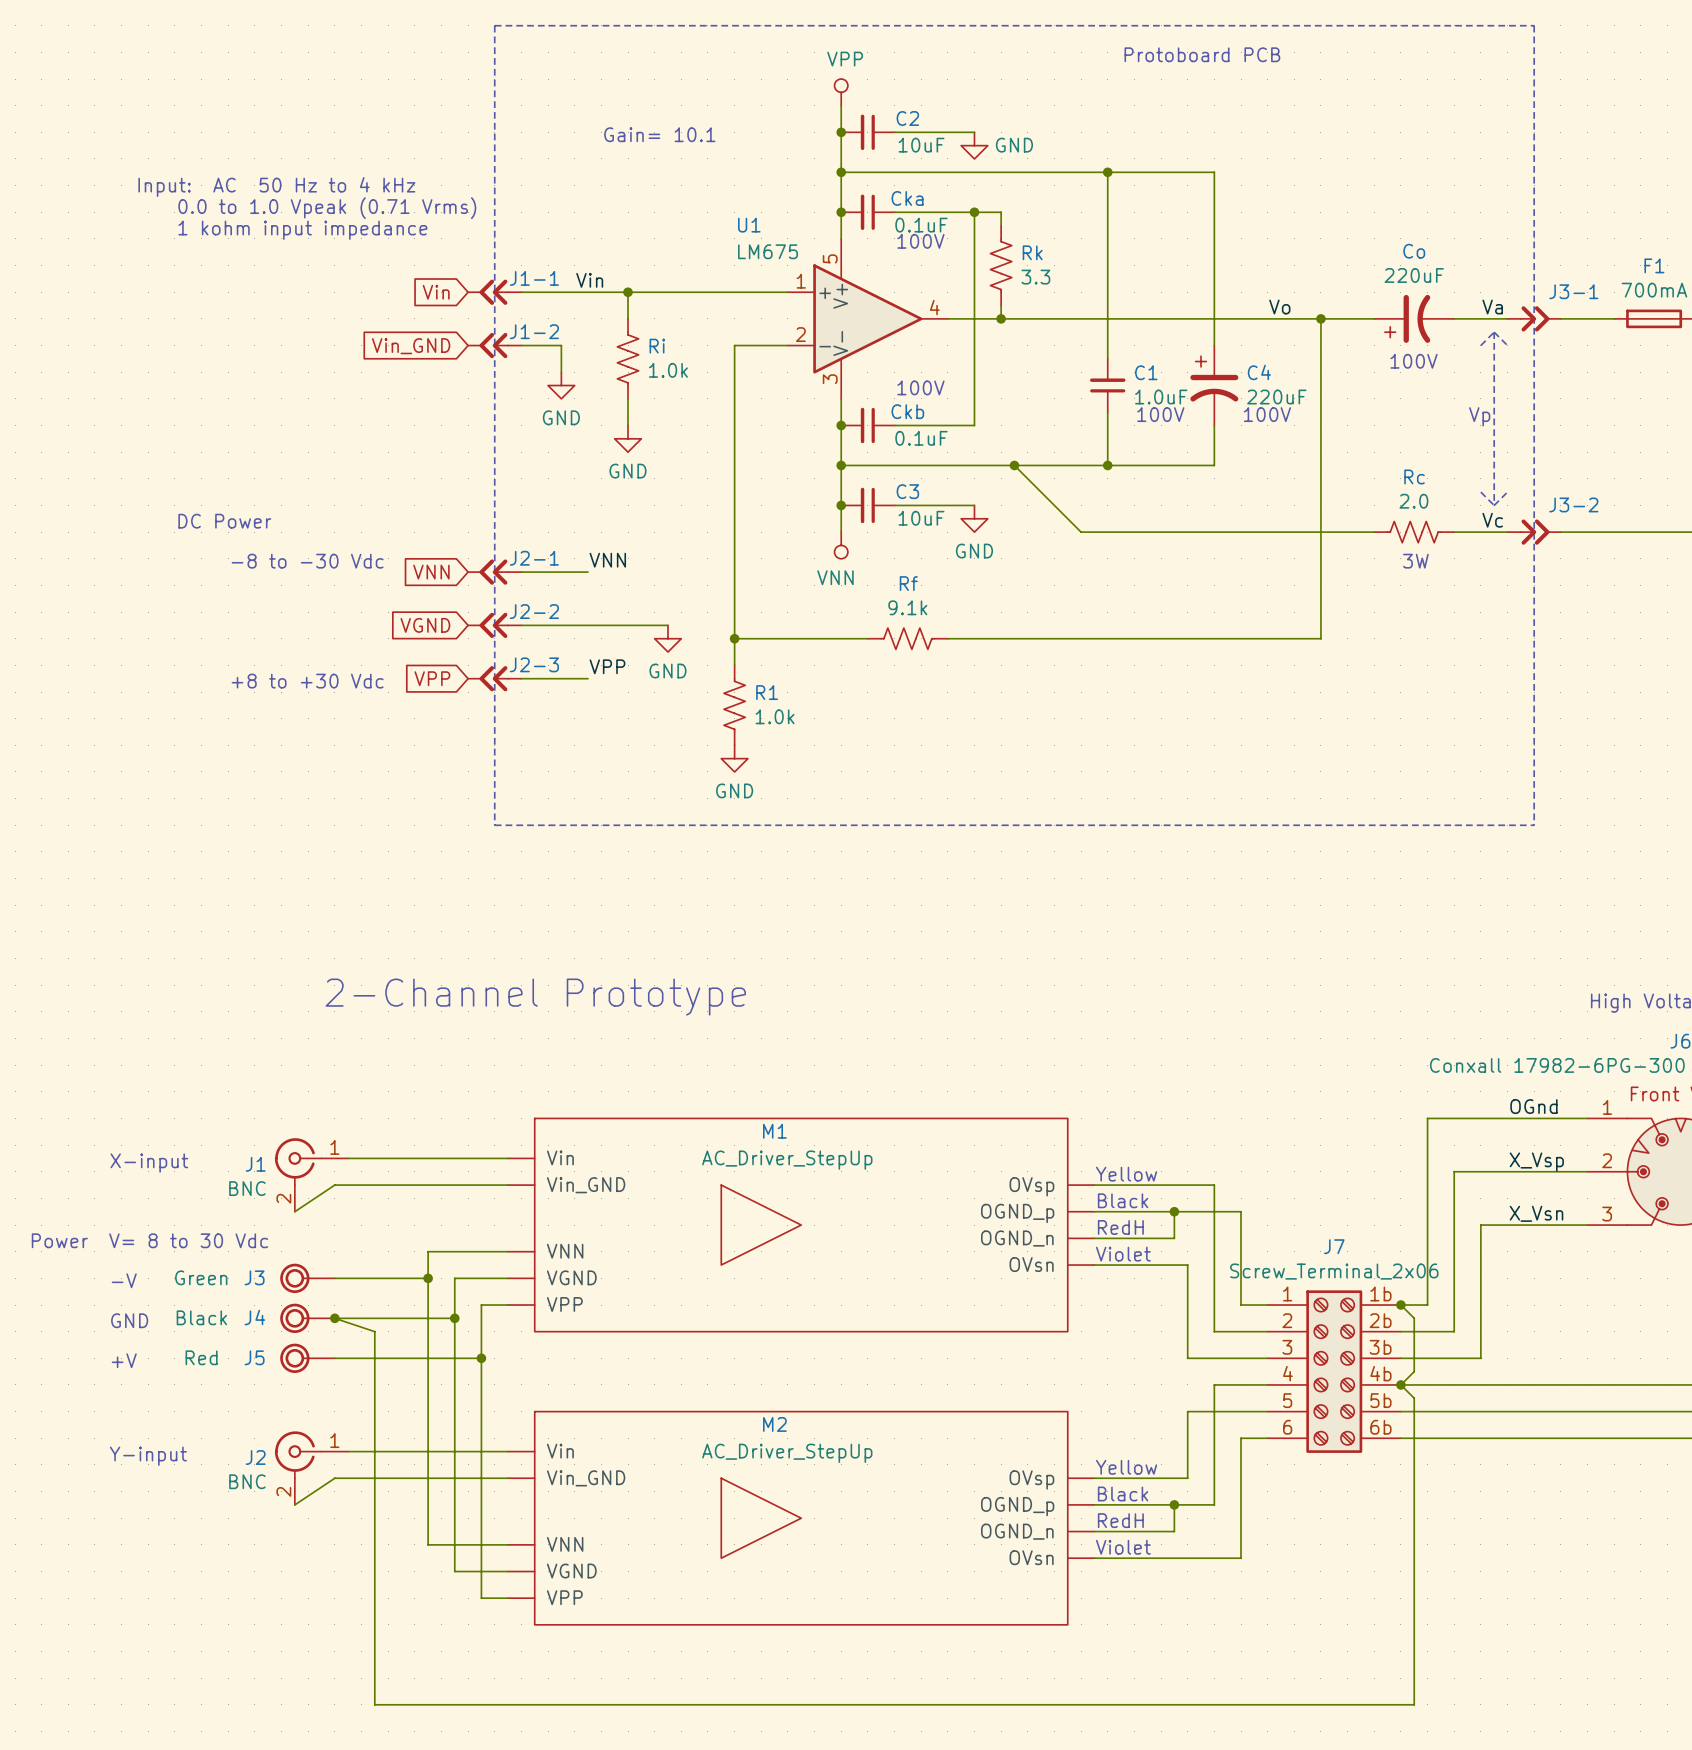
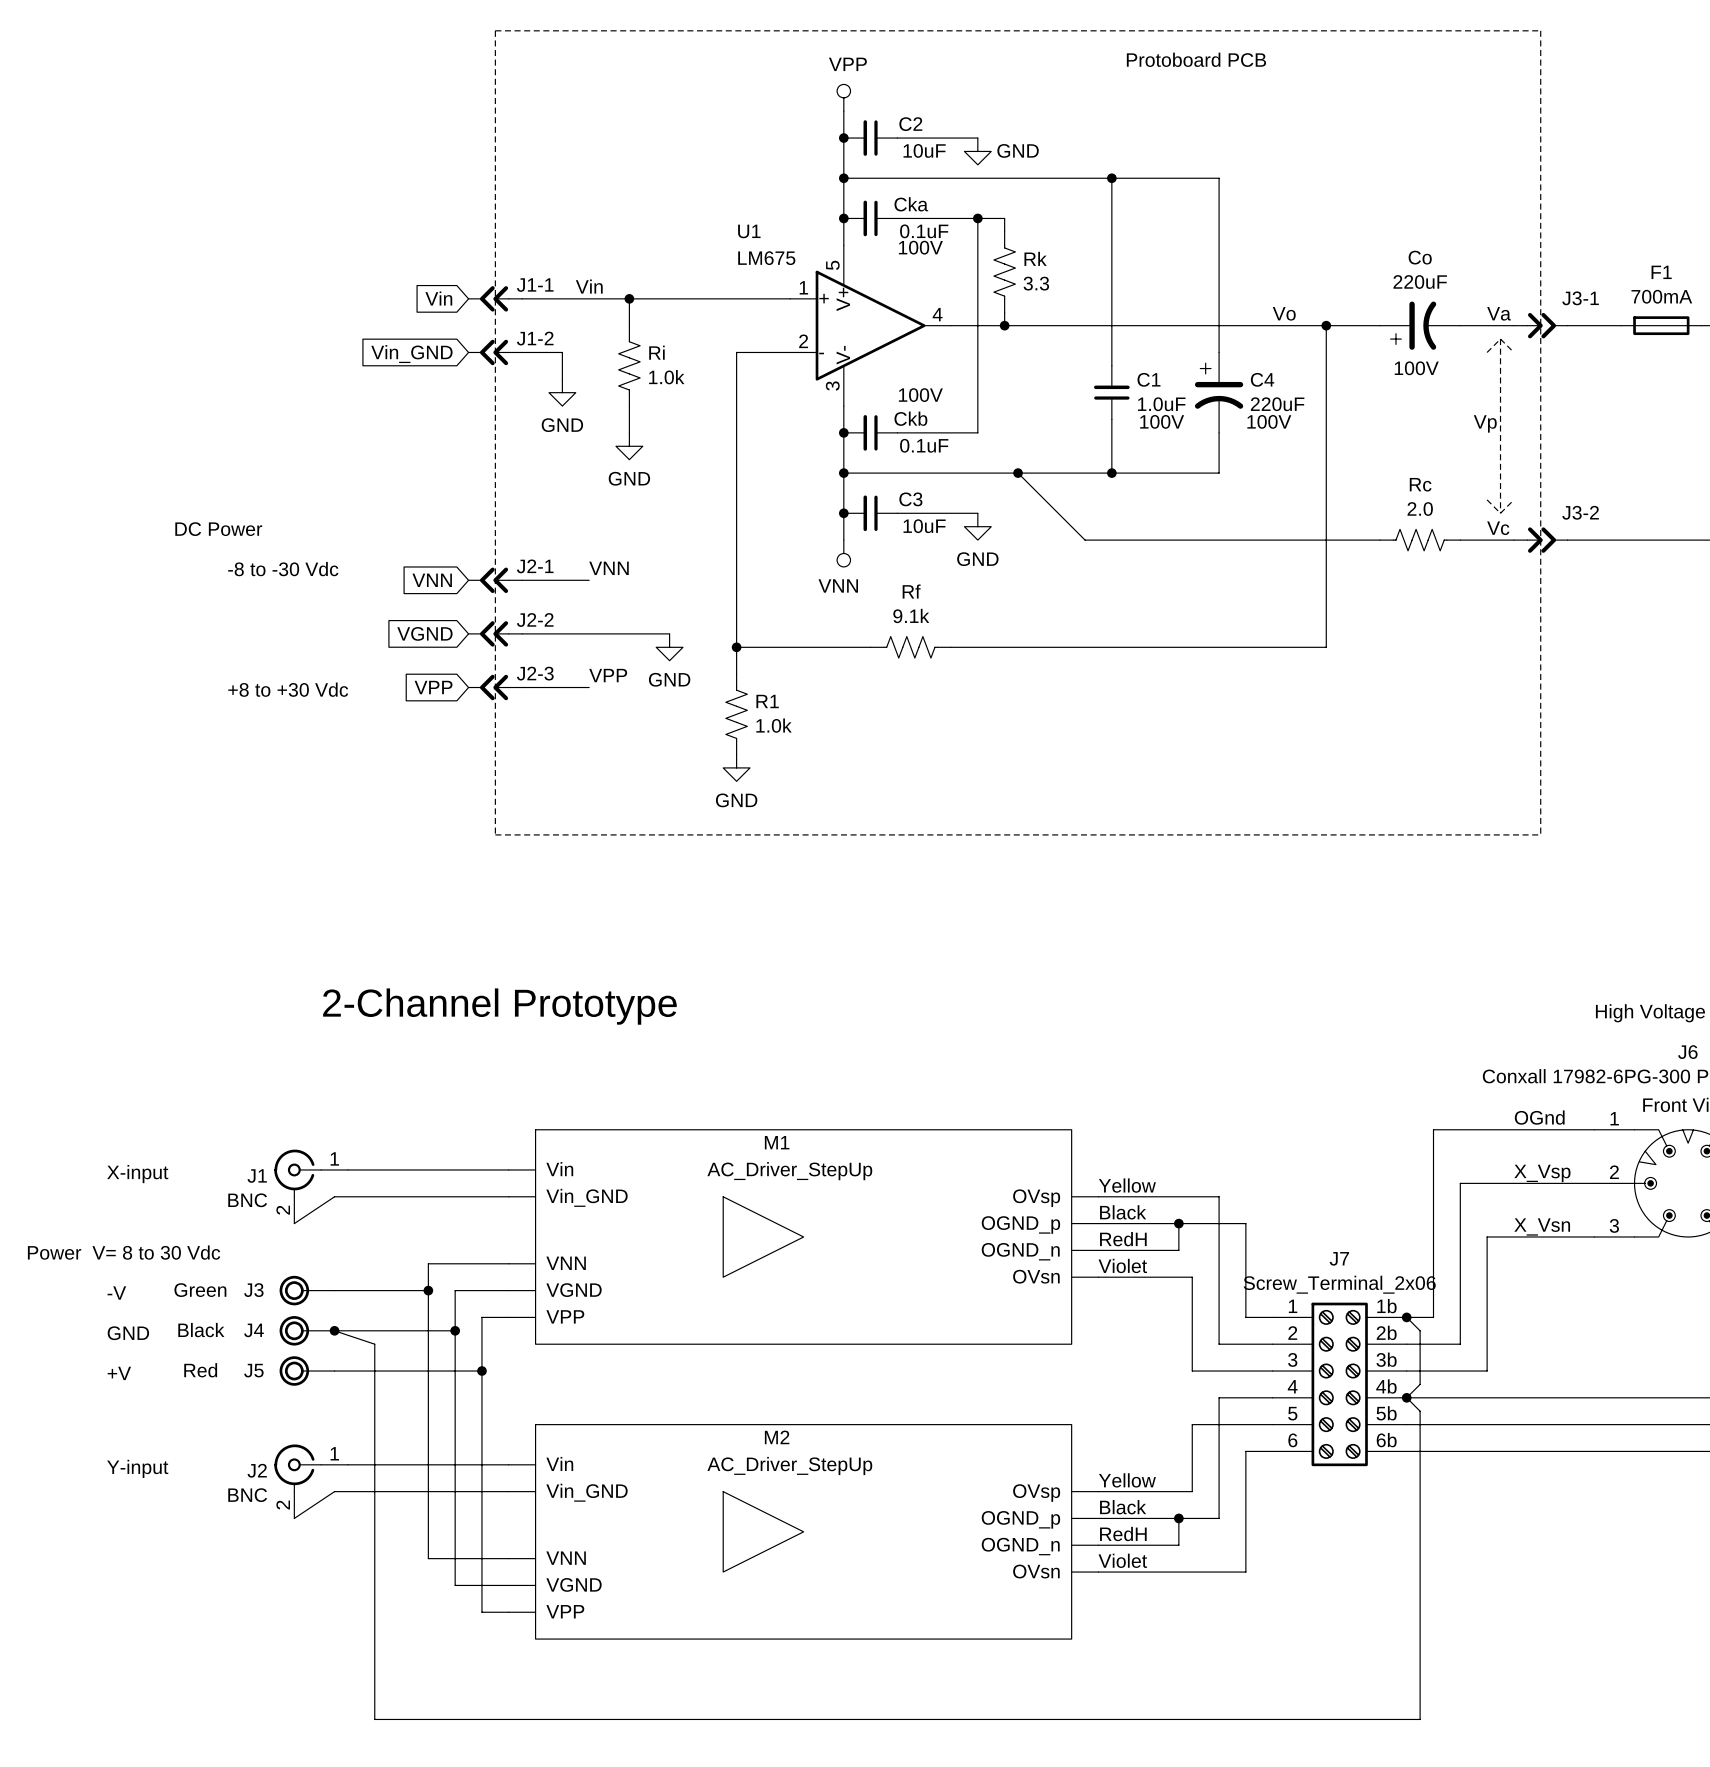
text: Gain= 10.1 (659, 134) -> none
text: Input: AC 50 Hz to 4 kHz (276, 187) -> none
text: 0.0 to 1.0 Vpeak (0.71 Vrms) (327, 208) -> none
text: 1 kohm input impedance (302, 230) -> none
text: 3W (1415, 561) -> none

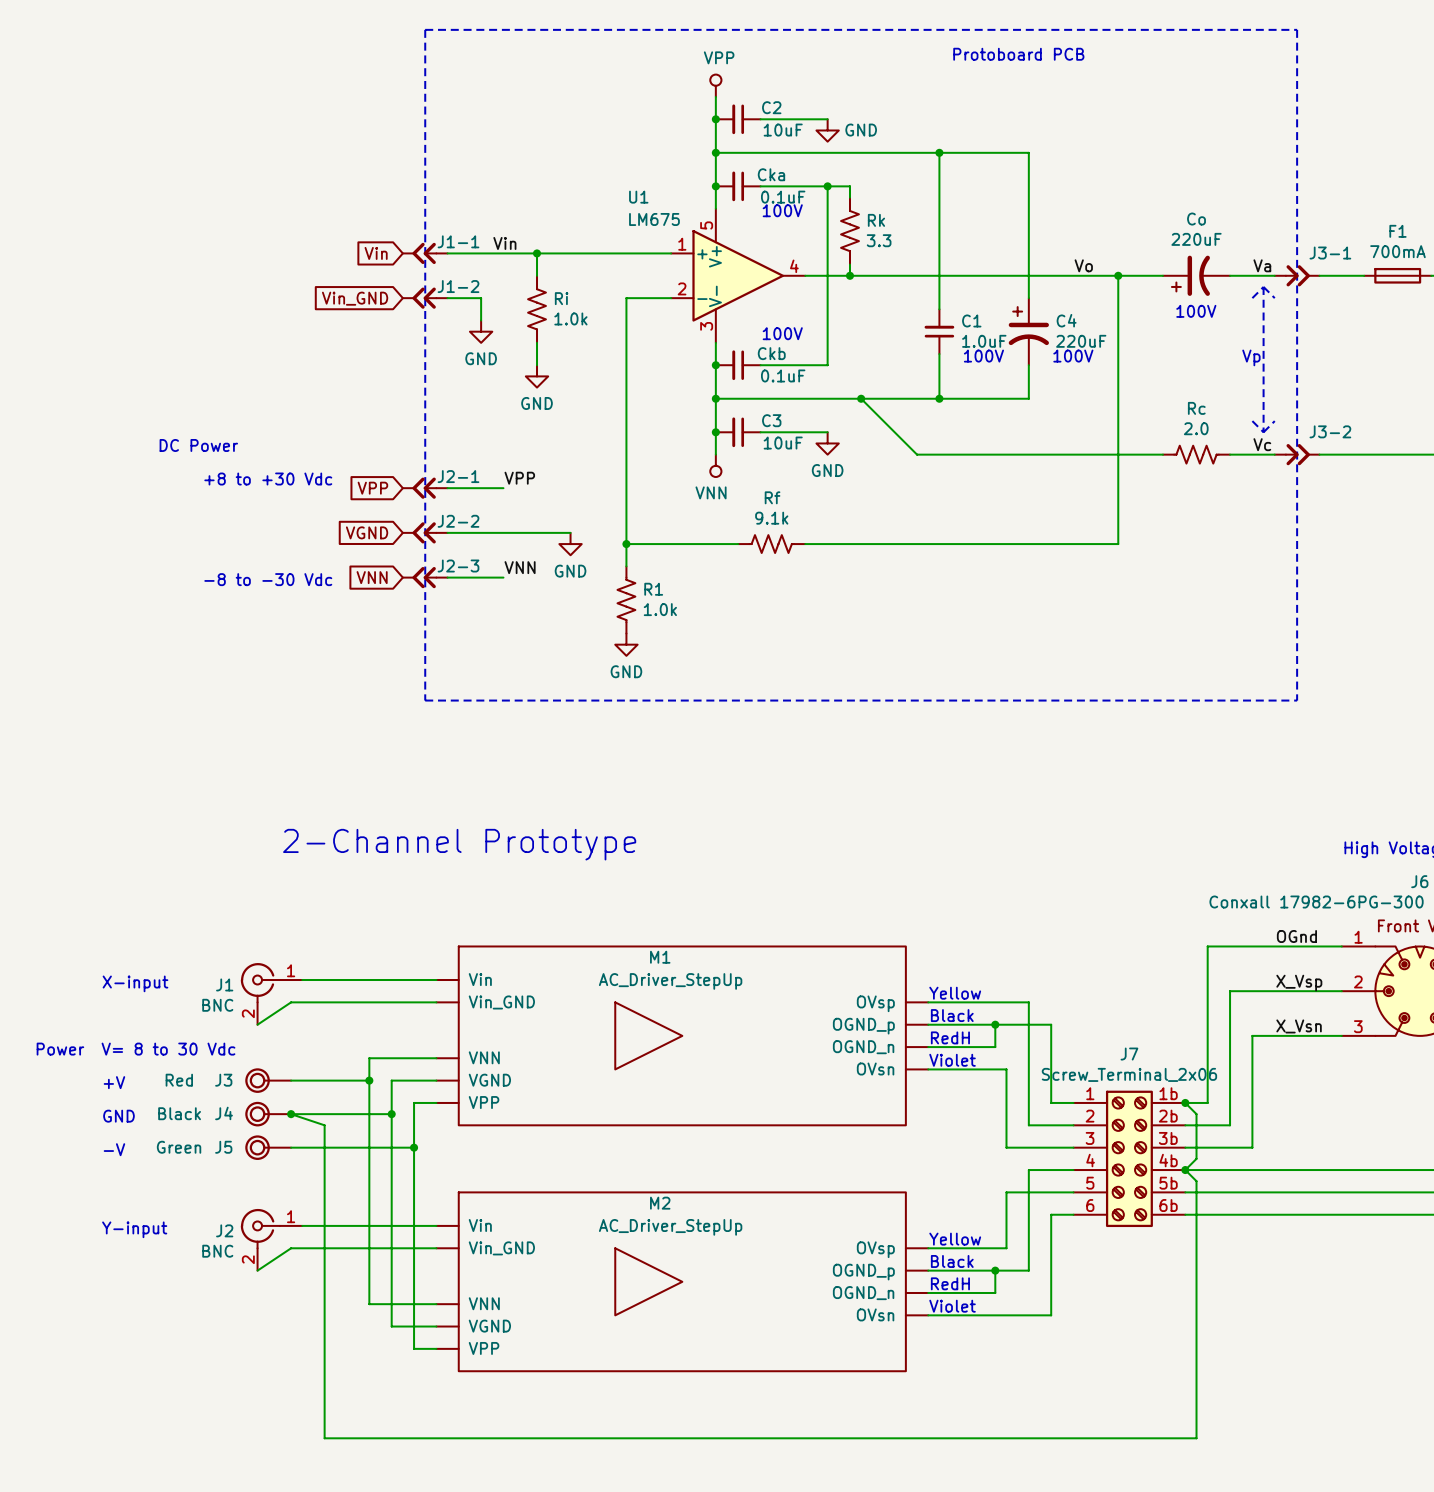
label: VNN (609, 568) -> VPP (519, 478)
text: -8 to -30 Vdc (283, 569) -> +8 to +30 Vdc (268, 479)
global label: VNN (432, 580) -> VPP (372, 488)
label: VPP (608, 675) -> VNN (520, 567)
global label: VPP (433, 687) -> VNN (372, 577)
text: +8 to +30 Vdc (288, 689) -> -8 to -30 Vdc (268, 579)
J3 value: Green (200, 1290) -> Red (179, 1080)
text: -V (116, 1293) -> +V (114, 1082)
J5 value: Red (200, 1370) -> Green (179, 1147)
text: +V (119, 1373) -> -V (114, 1149)

